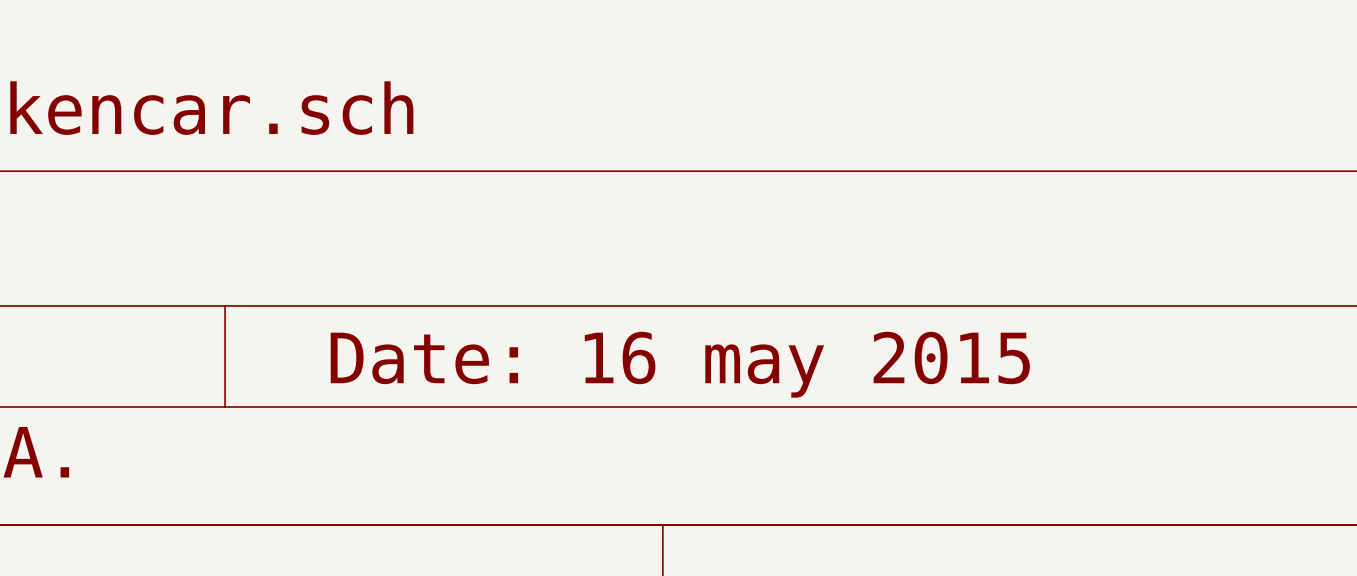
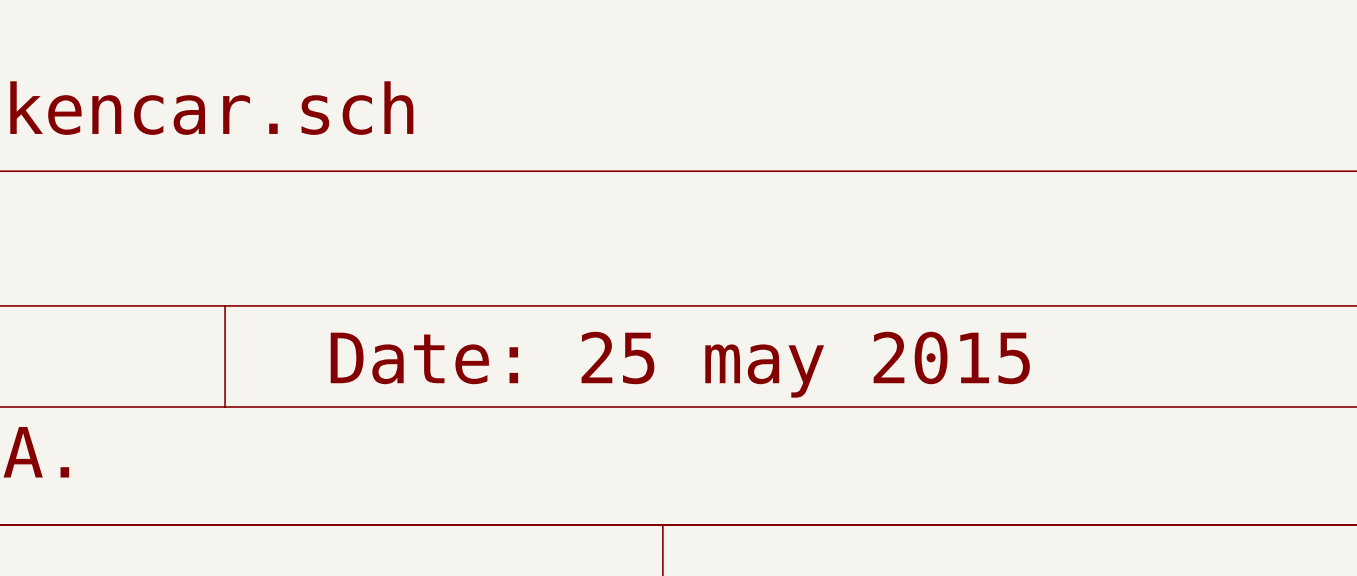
title block: Date: 16 may 2015 (680, 364) -> Date: 25 may 2015 (680, 364)

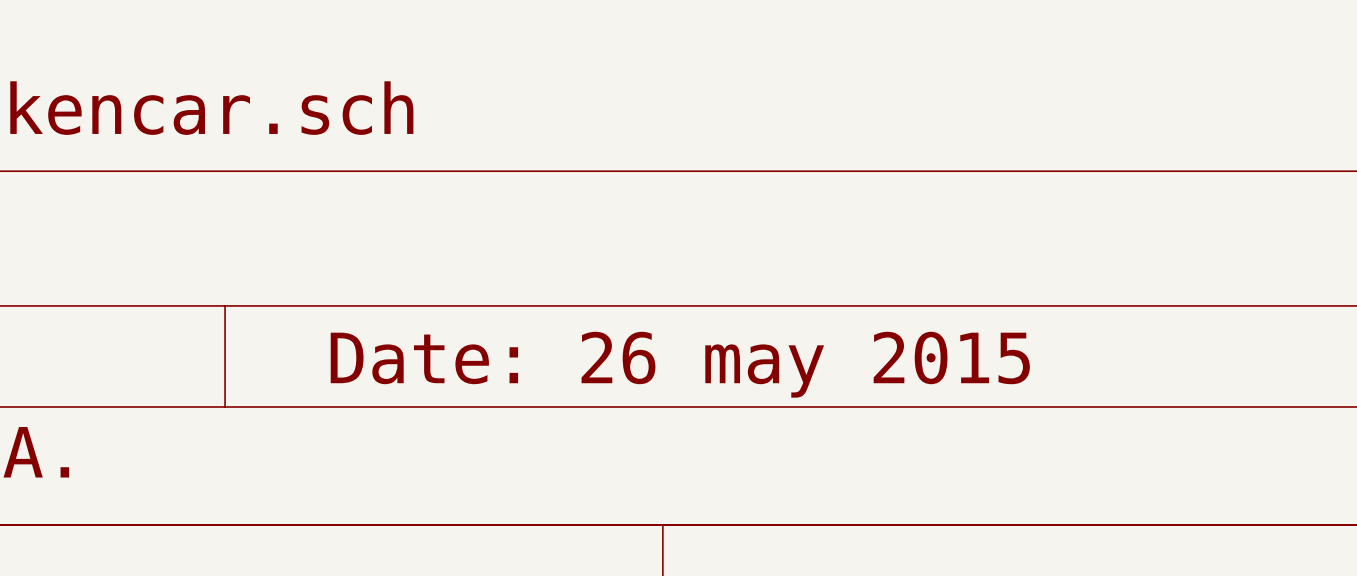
title block: Date: 25 may 2015 (680, 364) -> Date: 26 may 2015 (680, 364)

